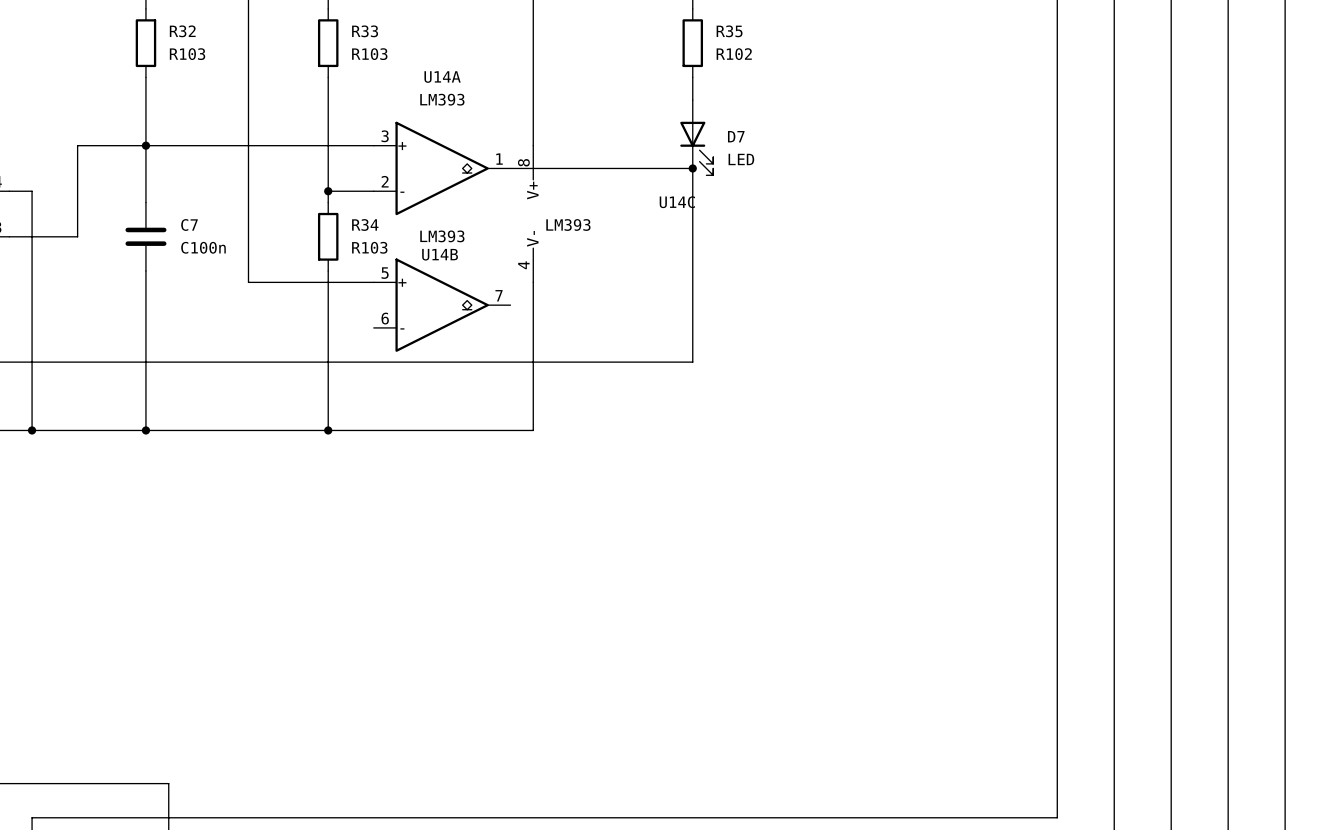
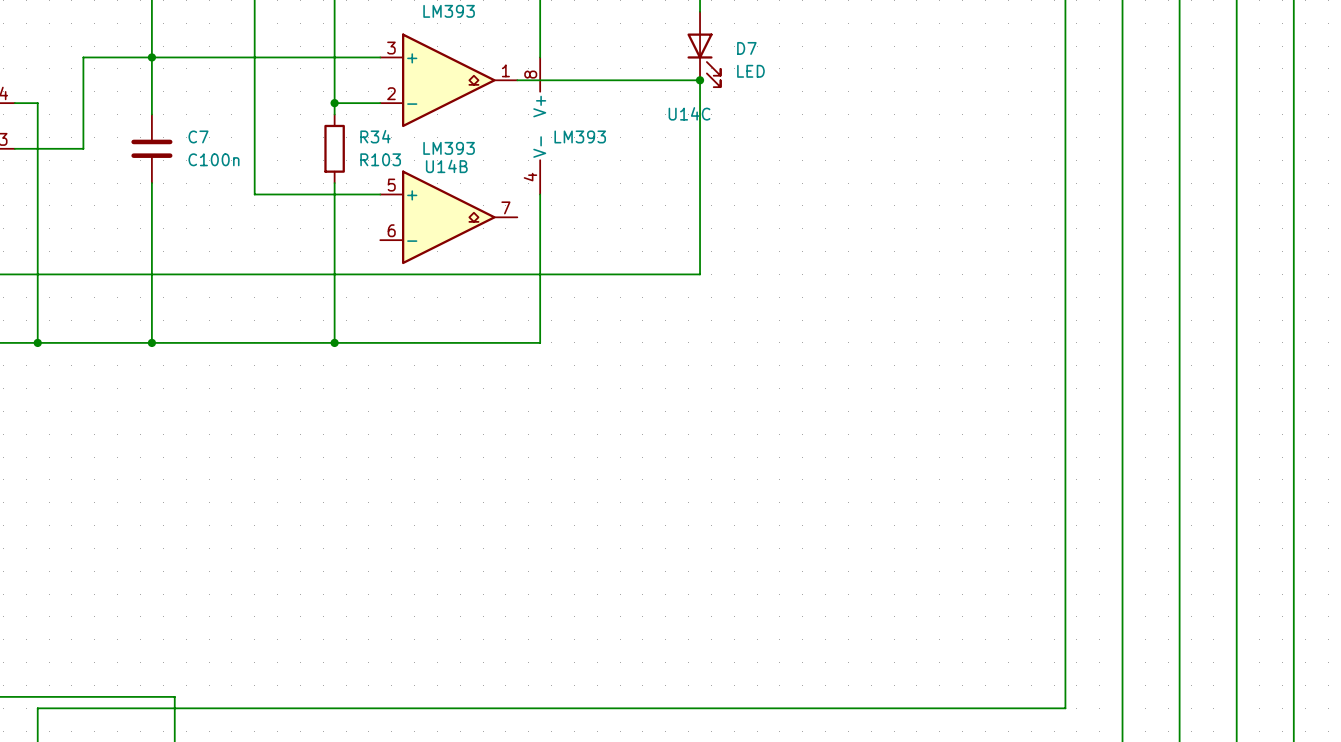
wire: (1057, 794) (1057, 817) (32, 817) -> (1065, 708) (37, 708) (37, 731)

